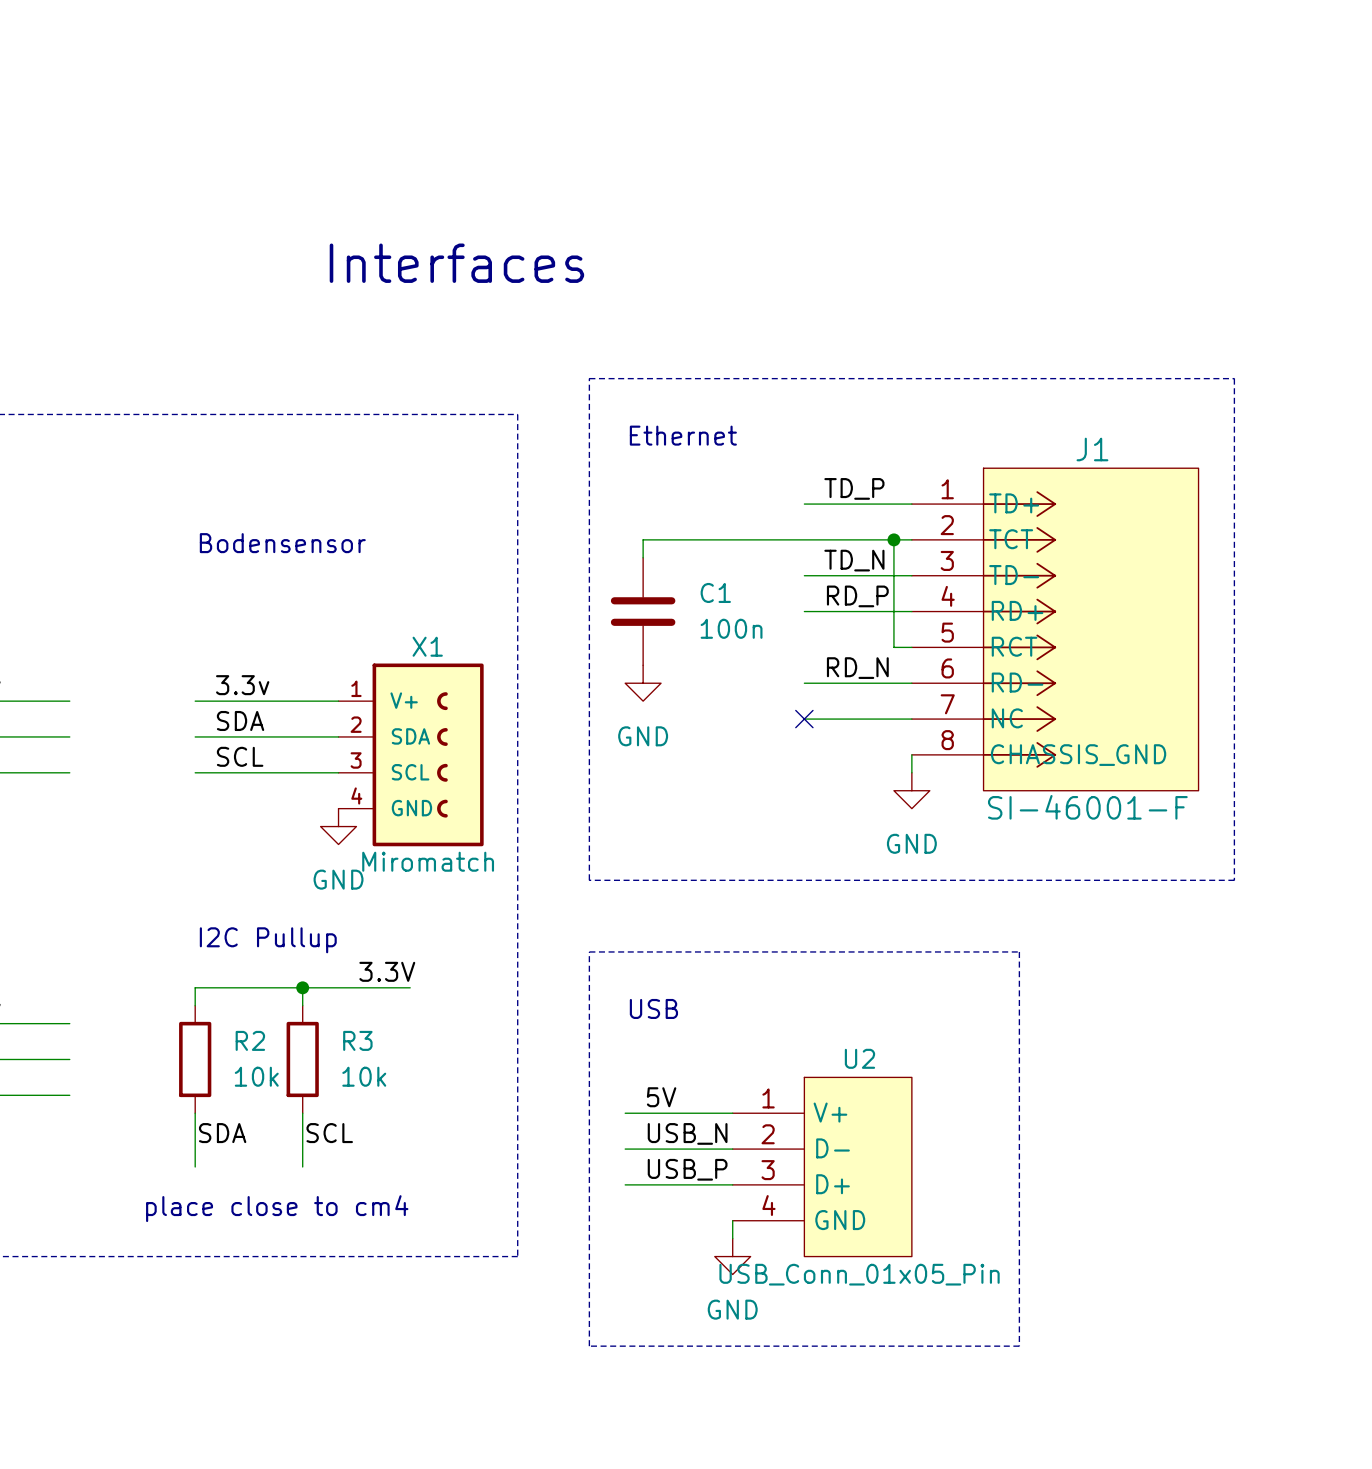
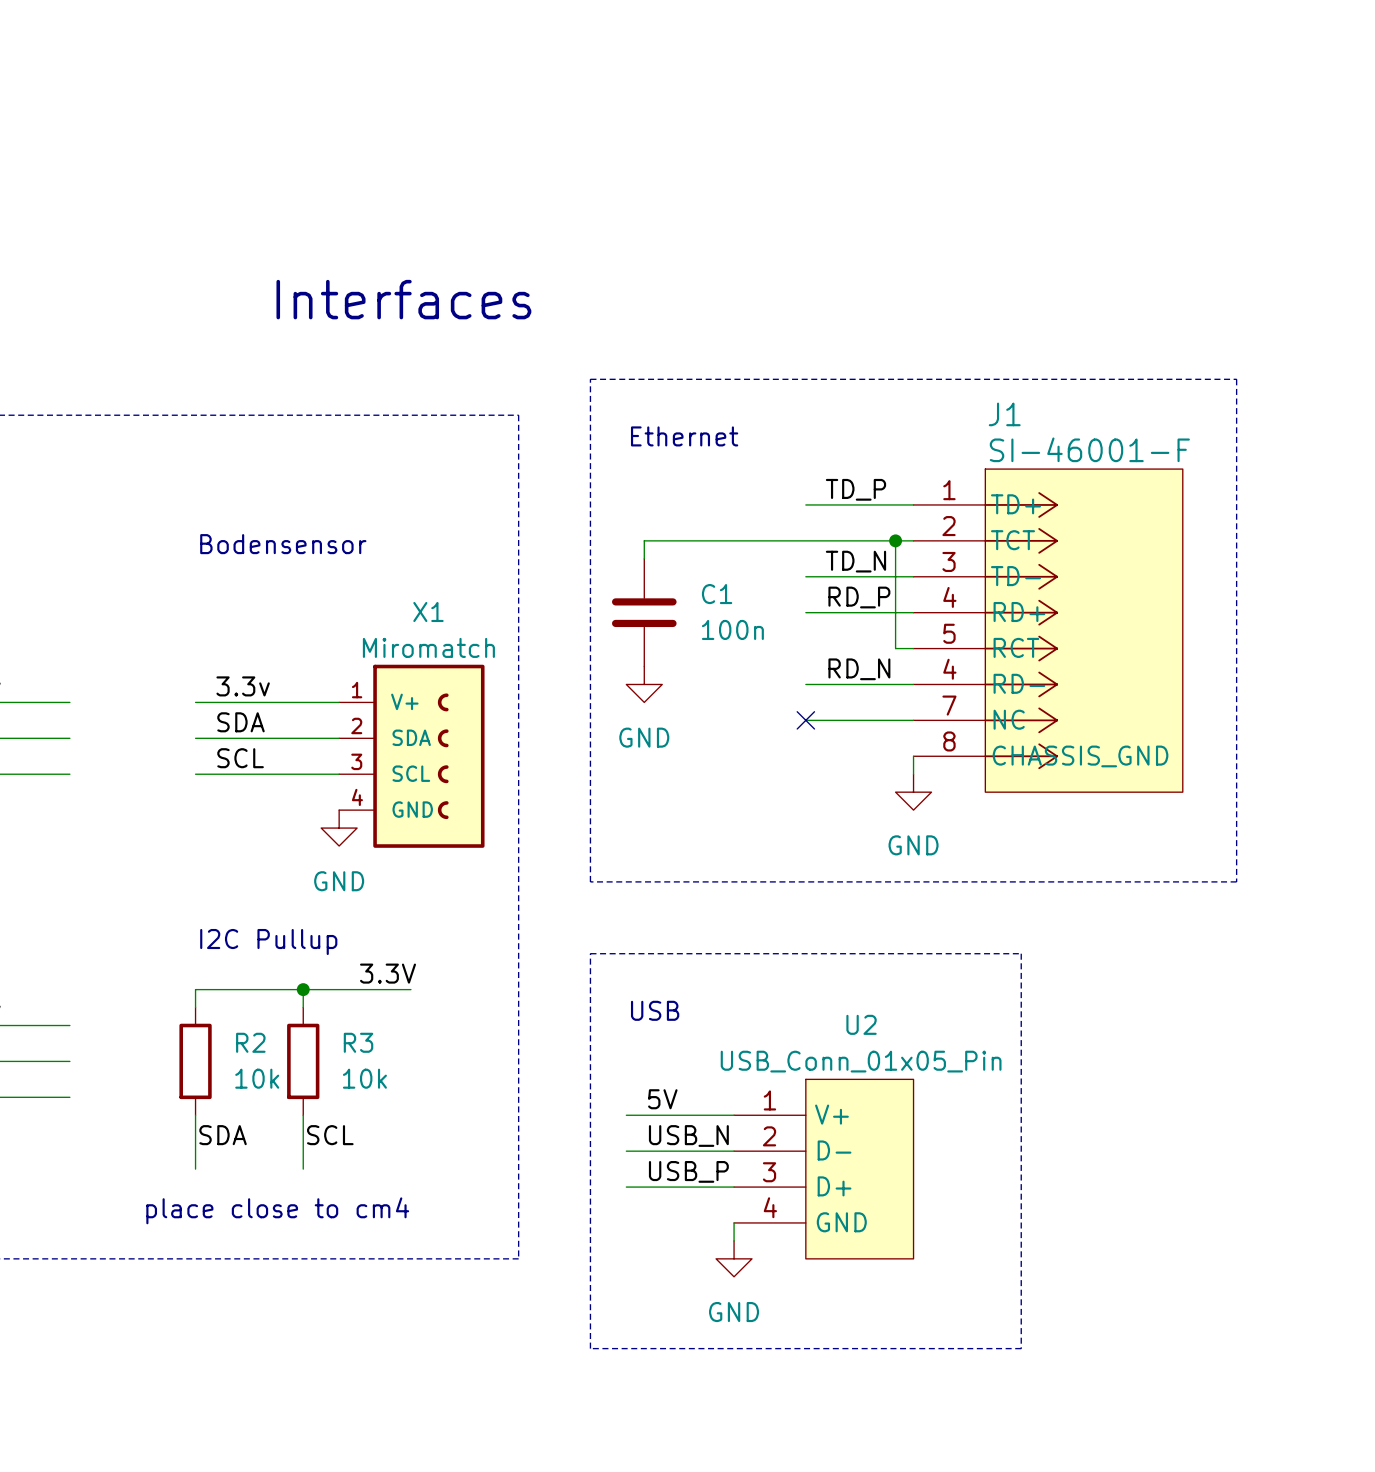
text position: Interfaces (456, 263) -> Interfaces (403, 299)
J1 name position: J1 (1092, 449) -> J1 (1004, 414)
J1 symbol: [911, 468, 1199, 791] -> [913, 469, 1183, 793]
X1 name position: X1 (427, 646) -> X1 (428, 612)
J1 value position: SI-46001-F (1087, 807) -> SI-46001-F (1089, 449)
X1 value position: Miromatch (428, 861) -> Miromatch (428, 647)
U2 name position: U2 (859, 1058) -> U2 (861, 1024)
U2 value position: USB_Conn_01x05_Pin (859, 1274) -> USB_Conn_01x05_Pin (861, 1061)

